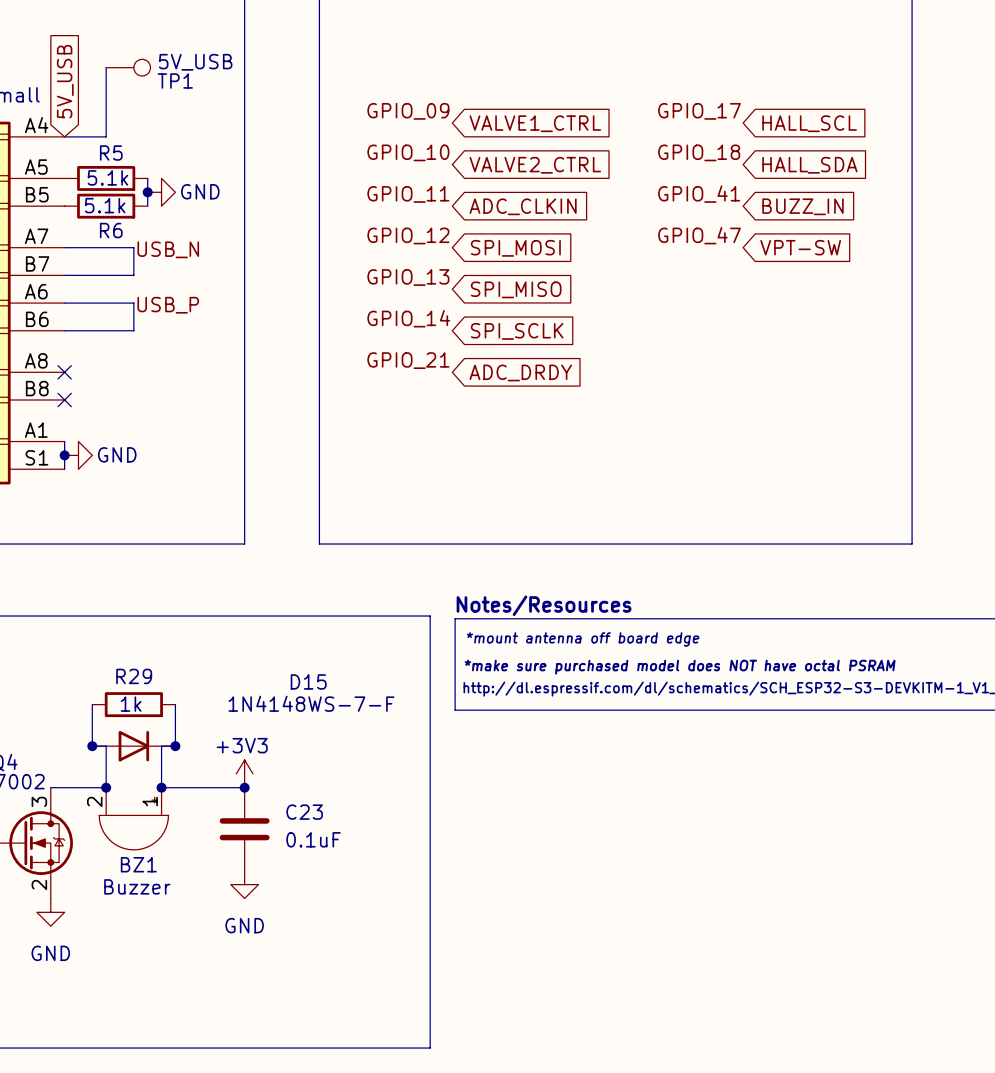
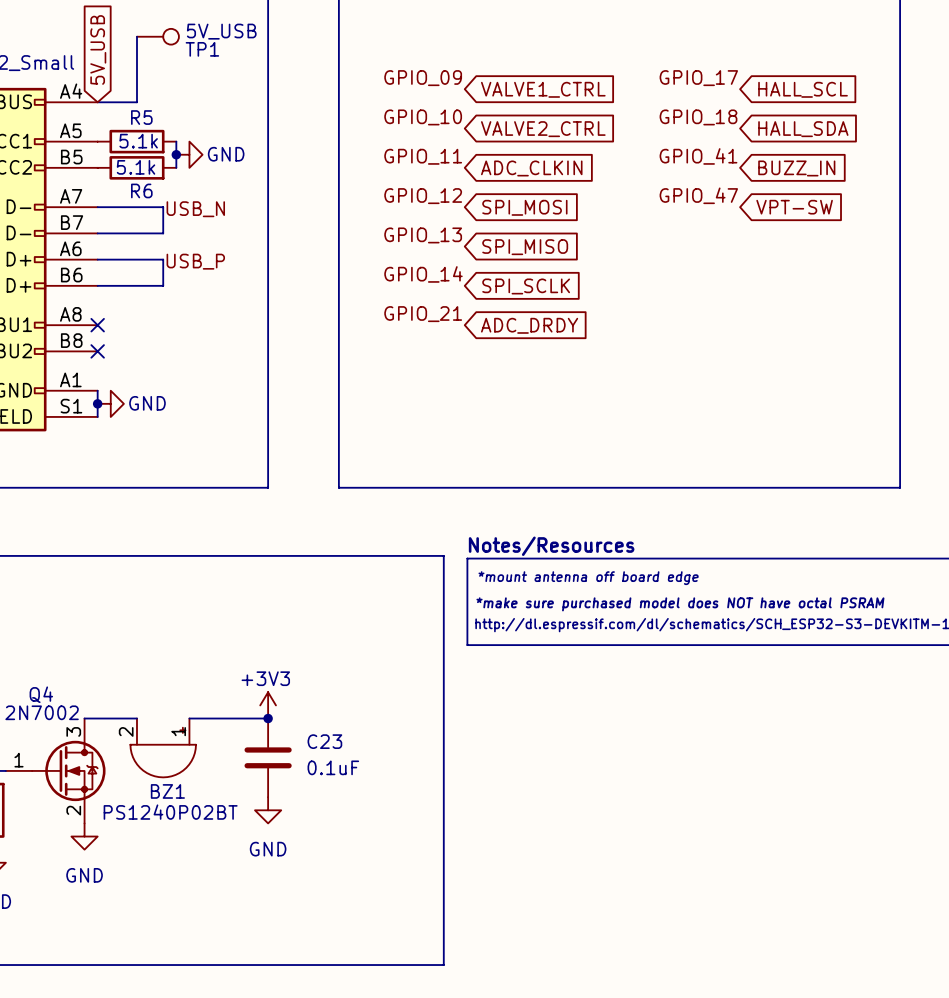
wire: (92, 704) (92, 746) (106, 746) (106, 787) -> none
R29: 1k (133, 704) -> none
wire: (175, 704) (175, 746) (161, 746) (161, 787) -> none
junction: (92, 746) -> none
D15: 1N4148WS-7-F (133, 746) -> none
junction: (175, 746) -> none
junction: (106, 787) -> none
junction: (161, 787) -> none
BZ1 value: Buzzer (137, 886) -> PS1240P02BT (170, 812)

